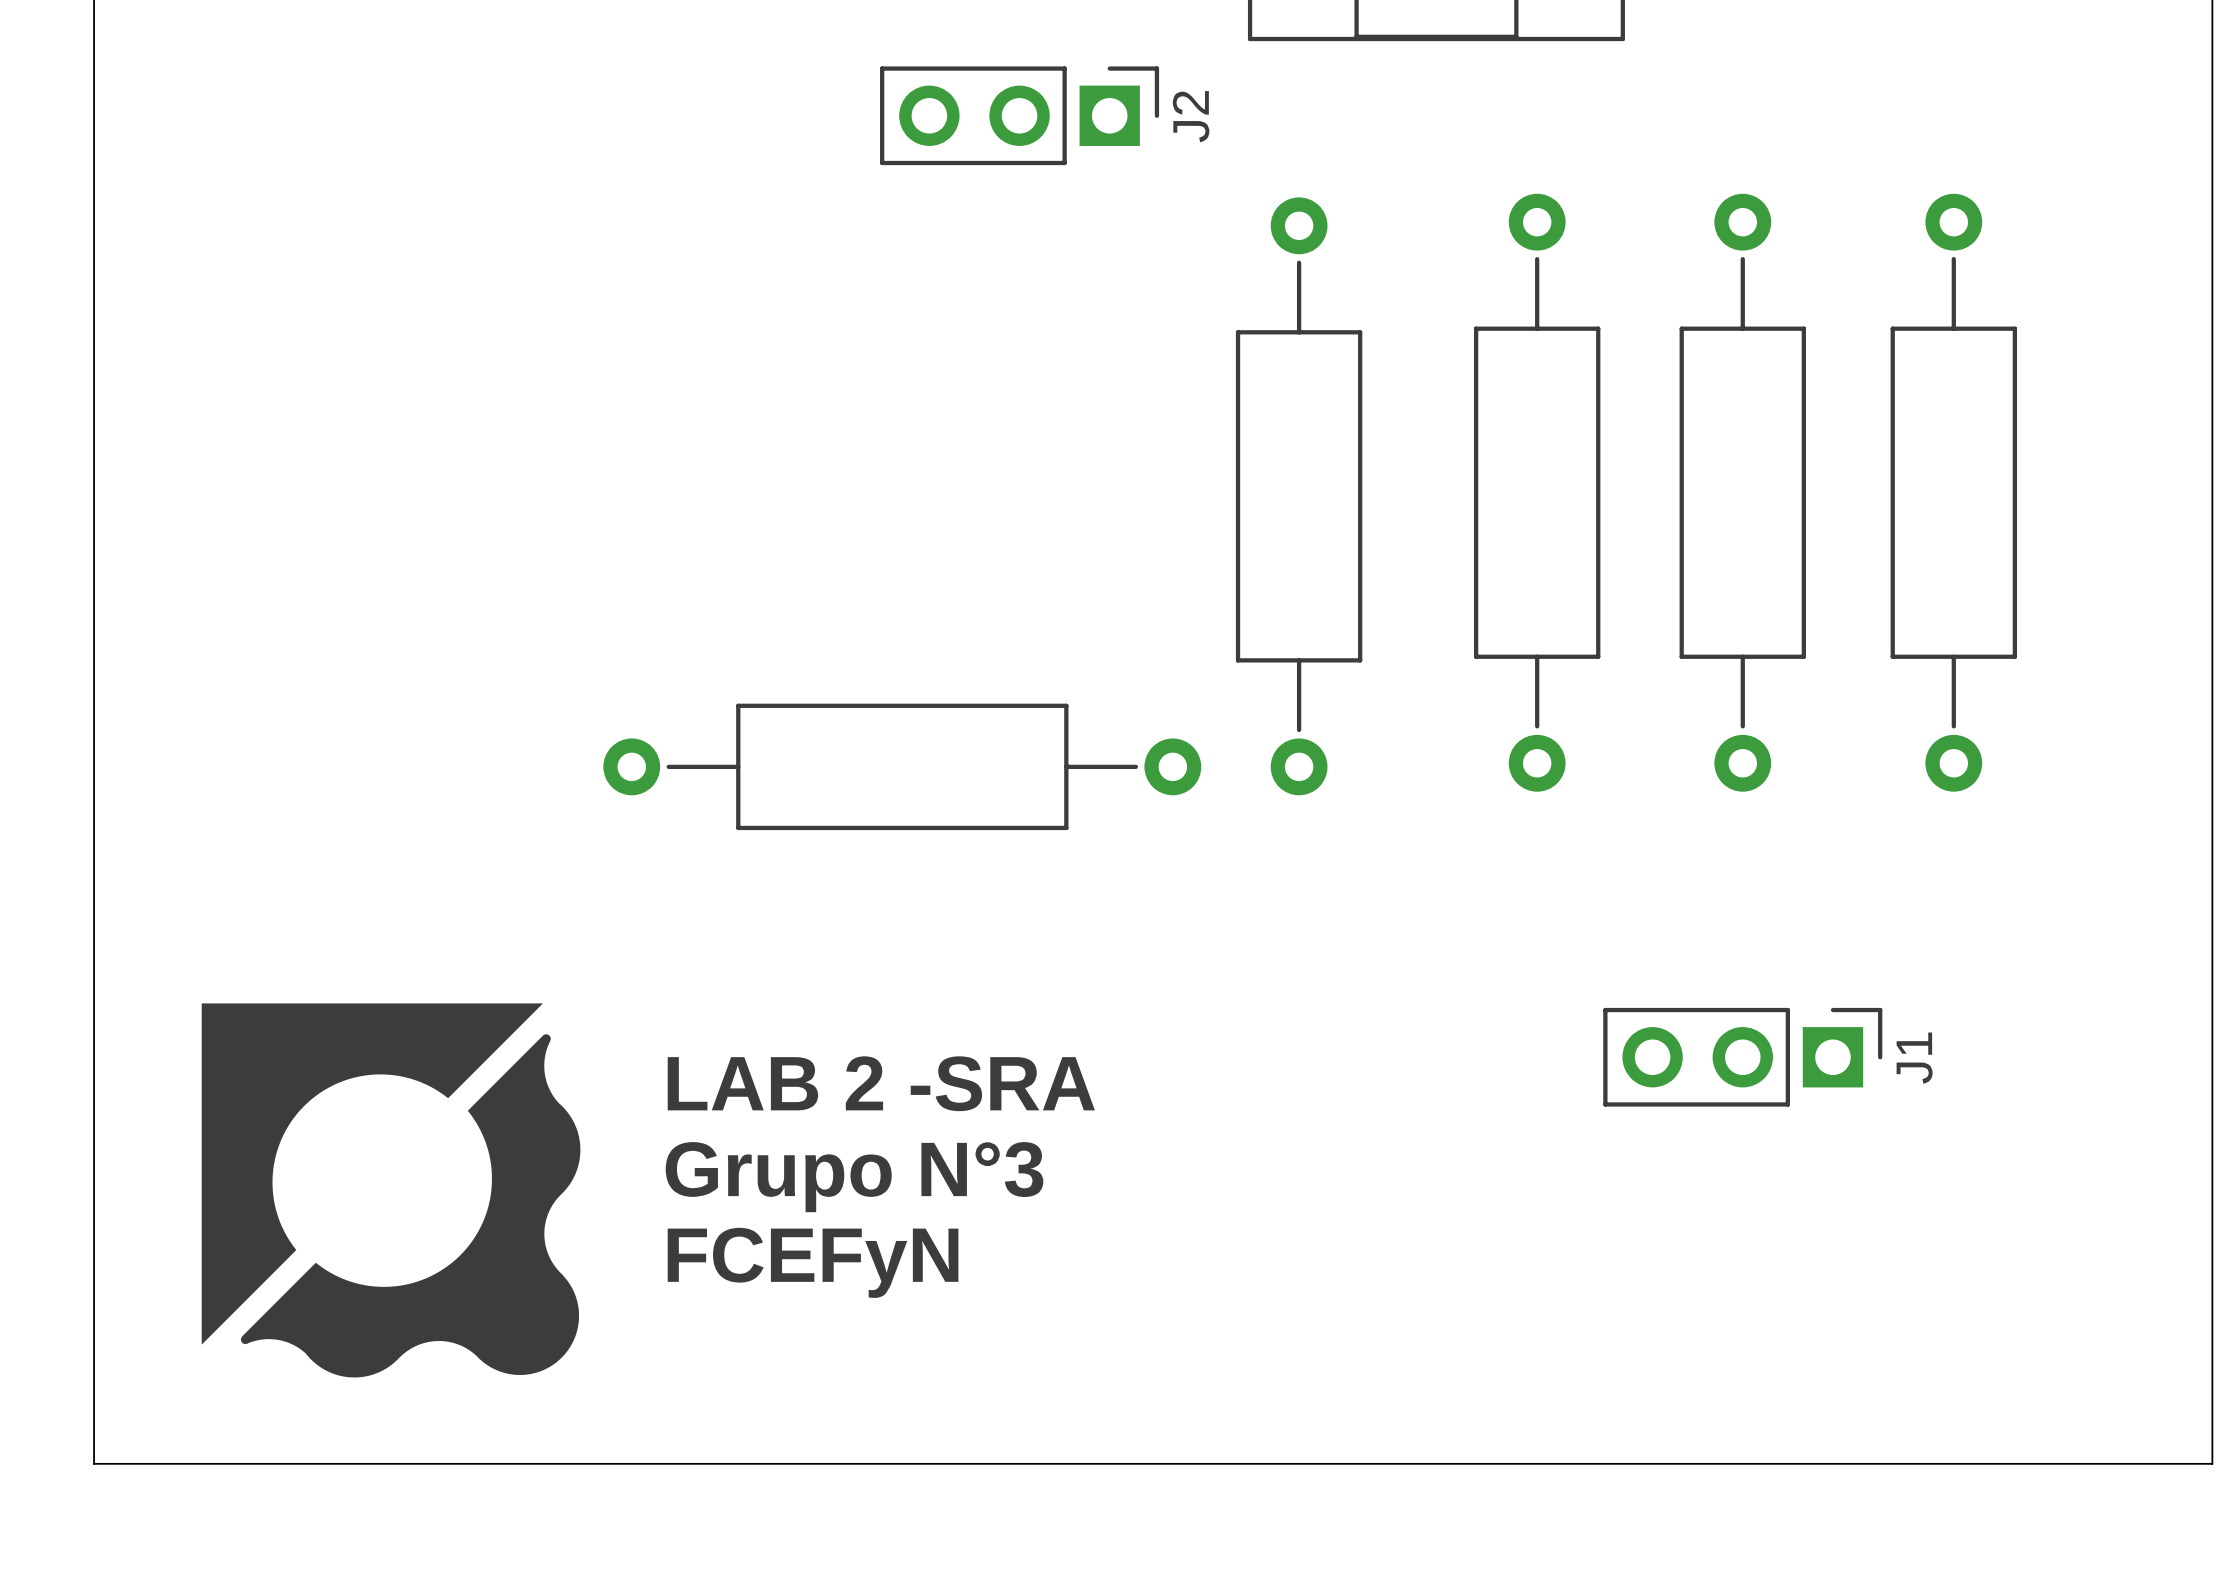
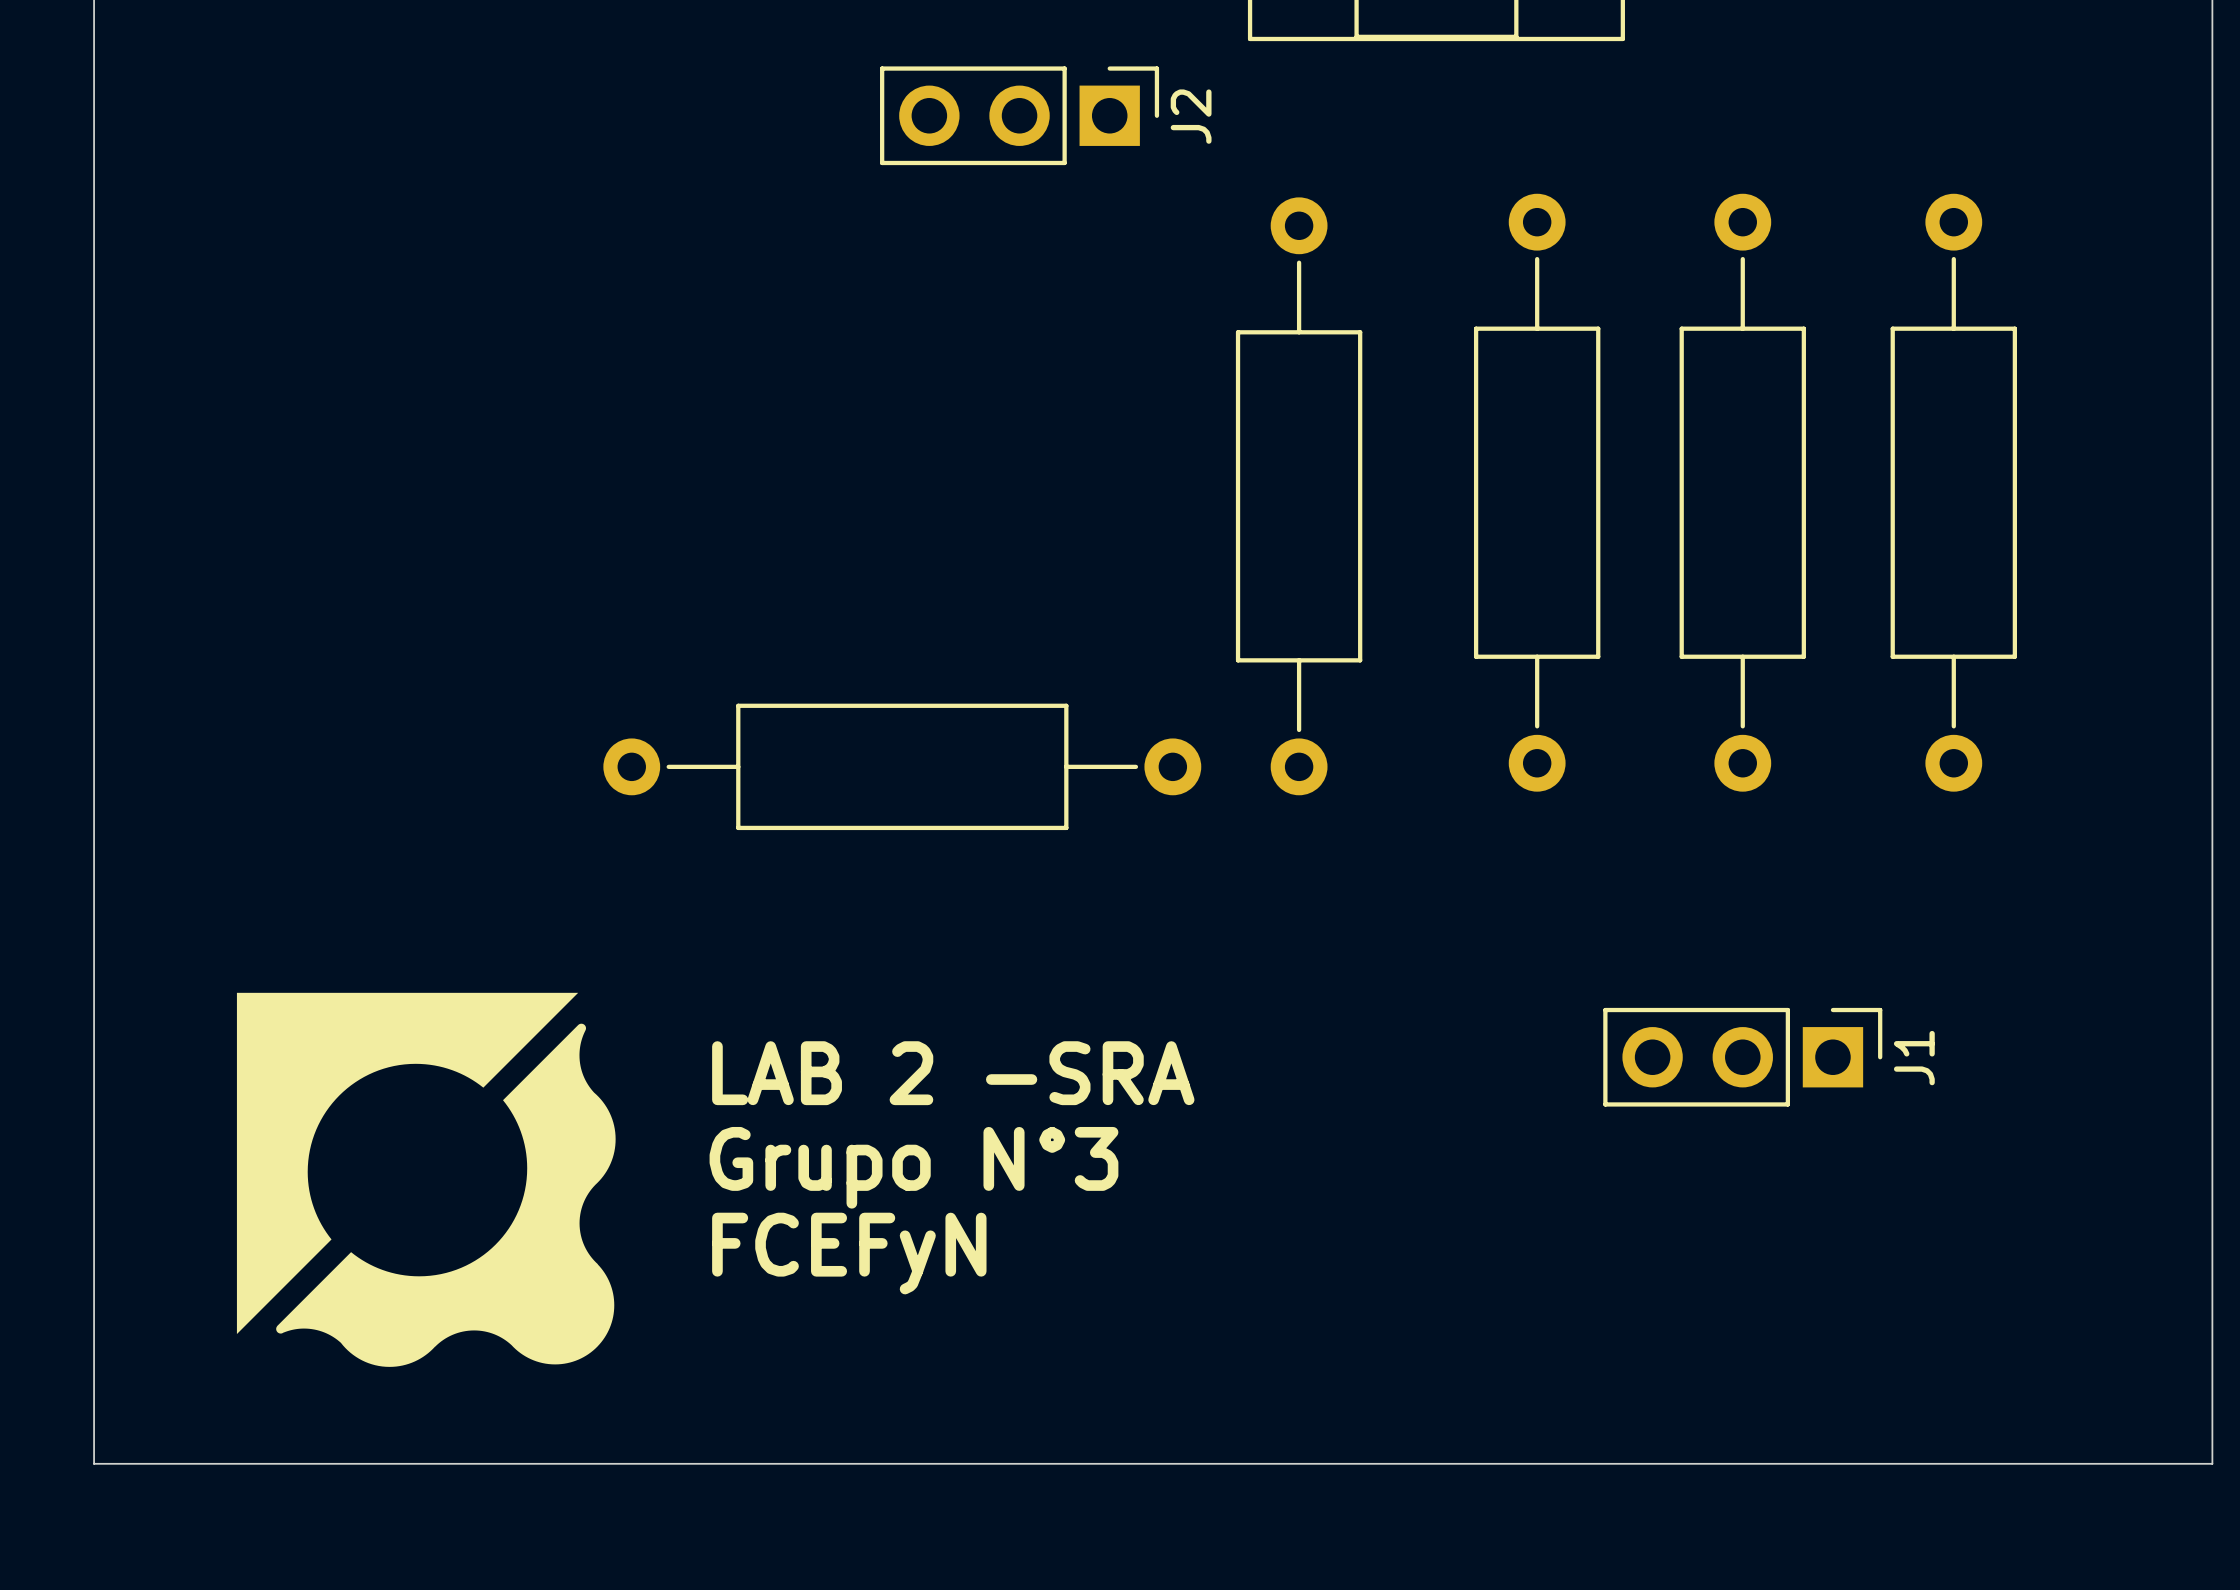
text position: LAB 2 -SRA (881, 1083) -> LAB 2 -SRA (953, 1073)
drawing position: (372, 1174) -> (407, 1163)
text position: Grupo N°3 (854, 1177) -> Grupo N°3 (913, 1167)
drawing position: (410, 1205) -> (445, 1195)
text position: FCEFyN (813, 1262) -> FCEFyN (849, 1253)

